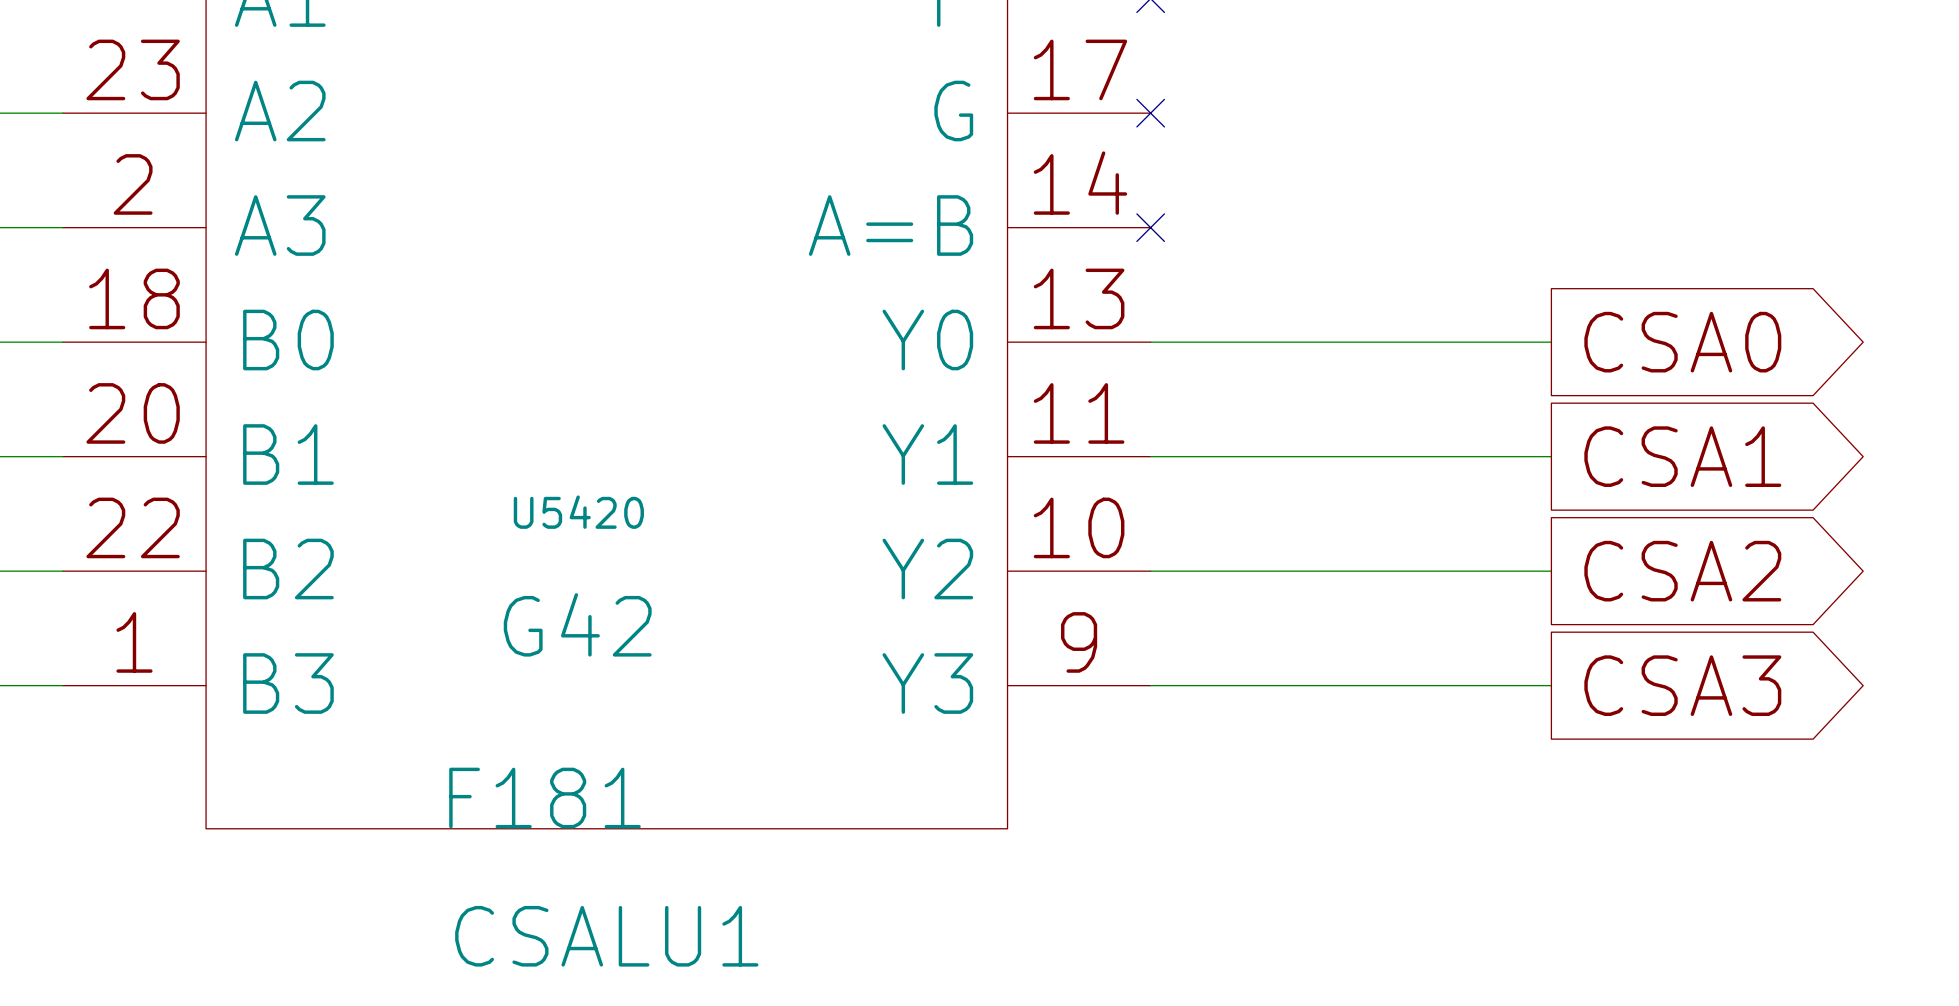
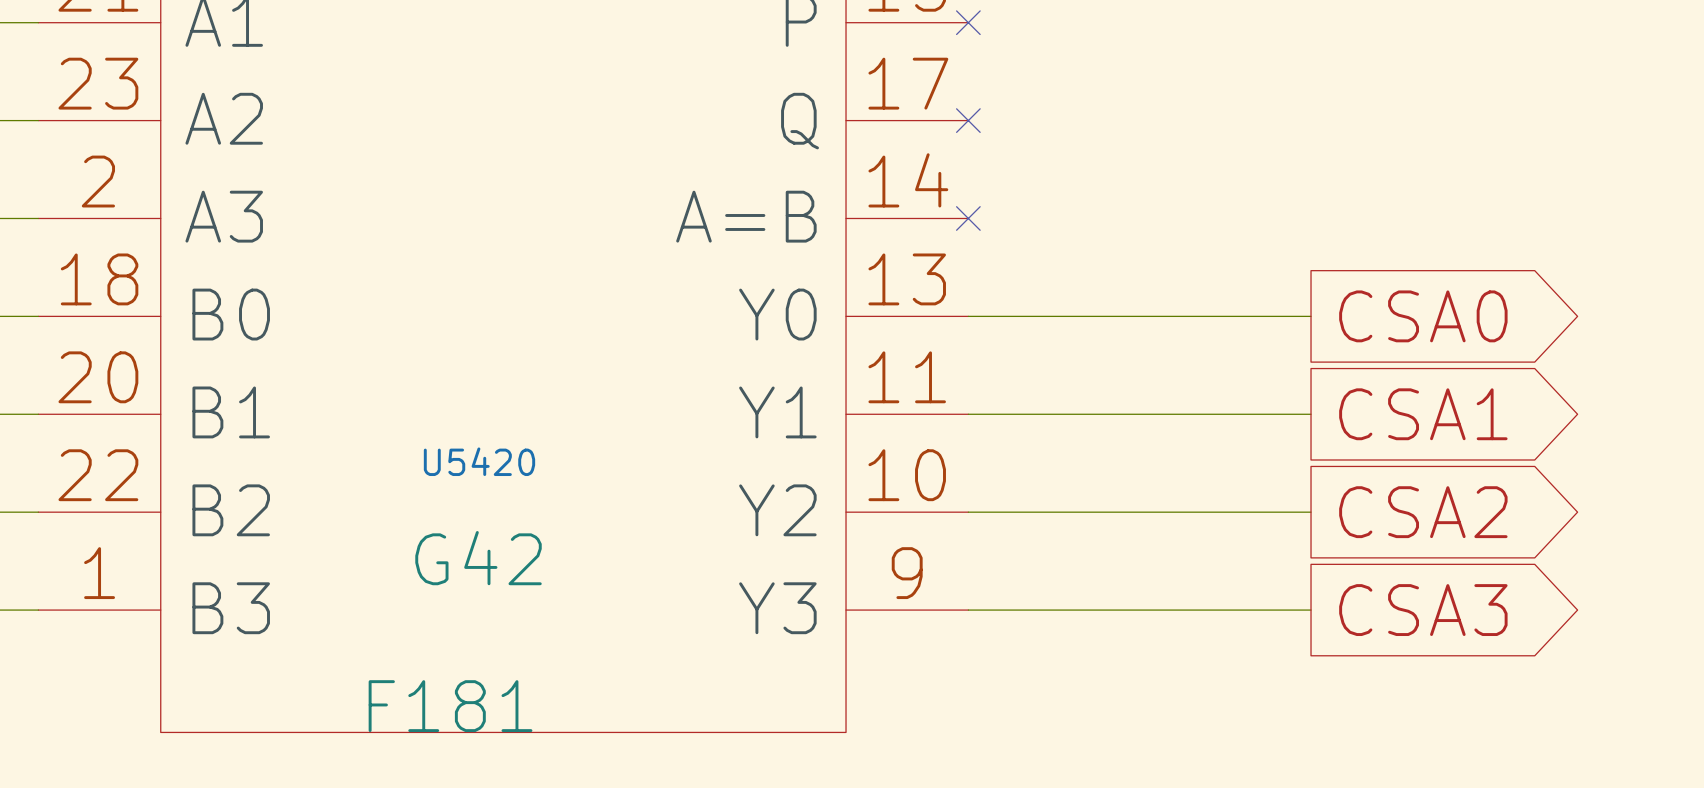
U5420 pin name: G (953, 111) -> Q (800, 121)

